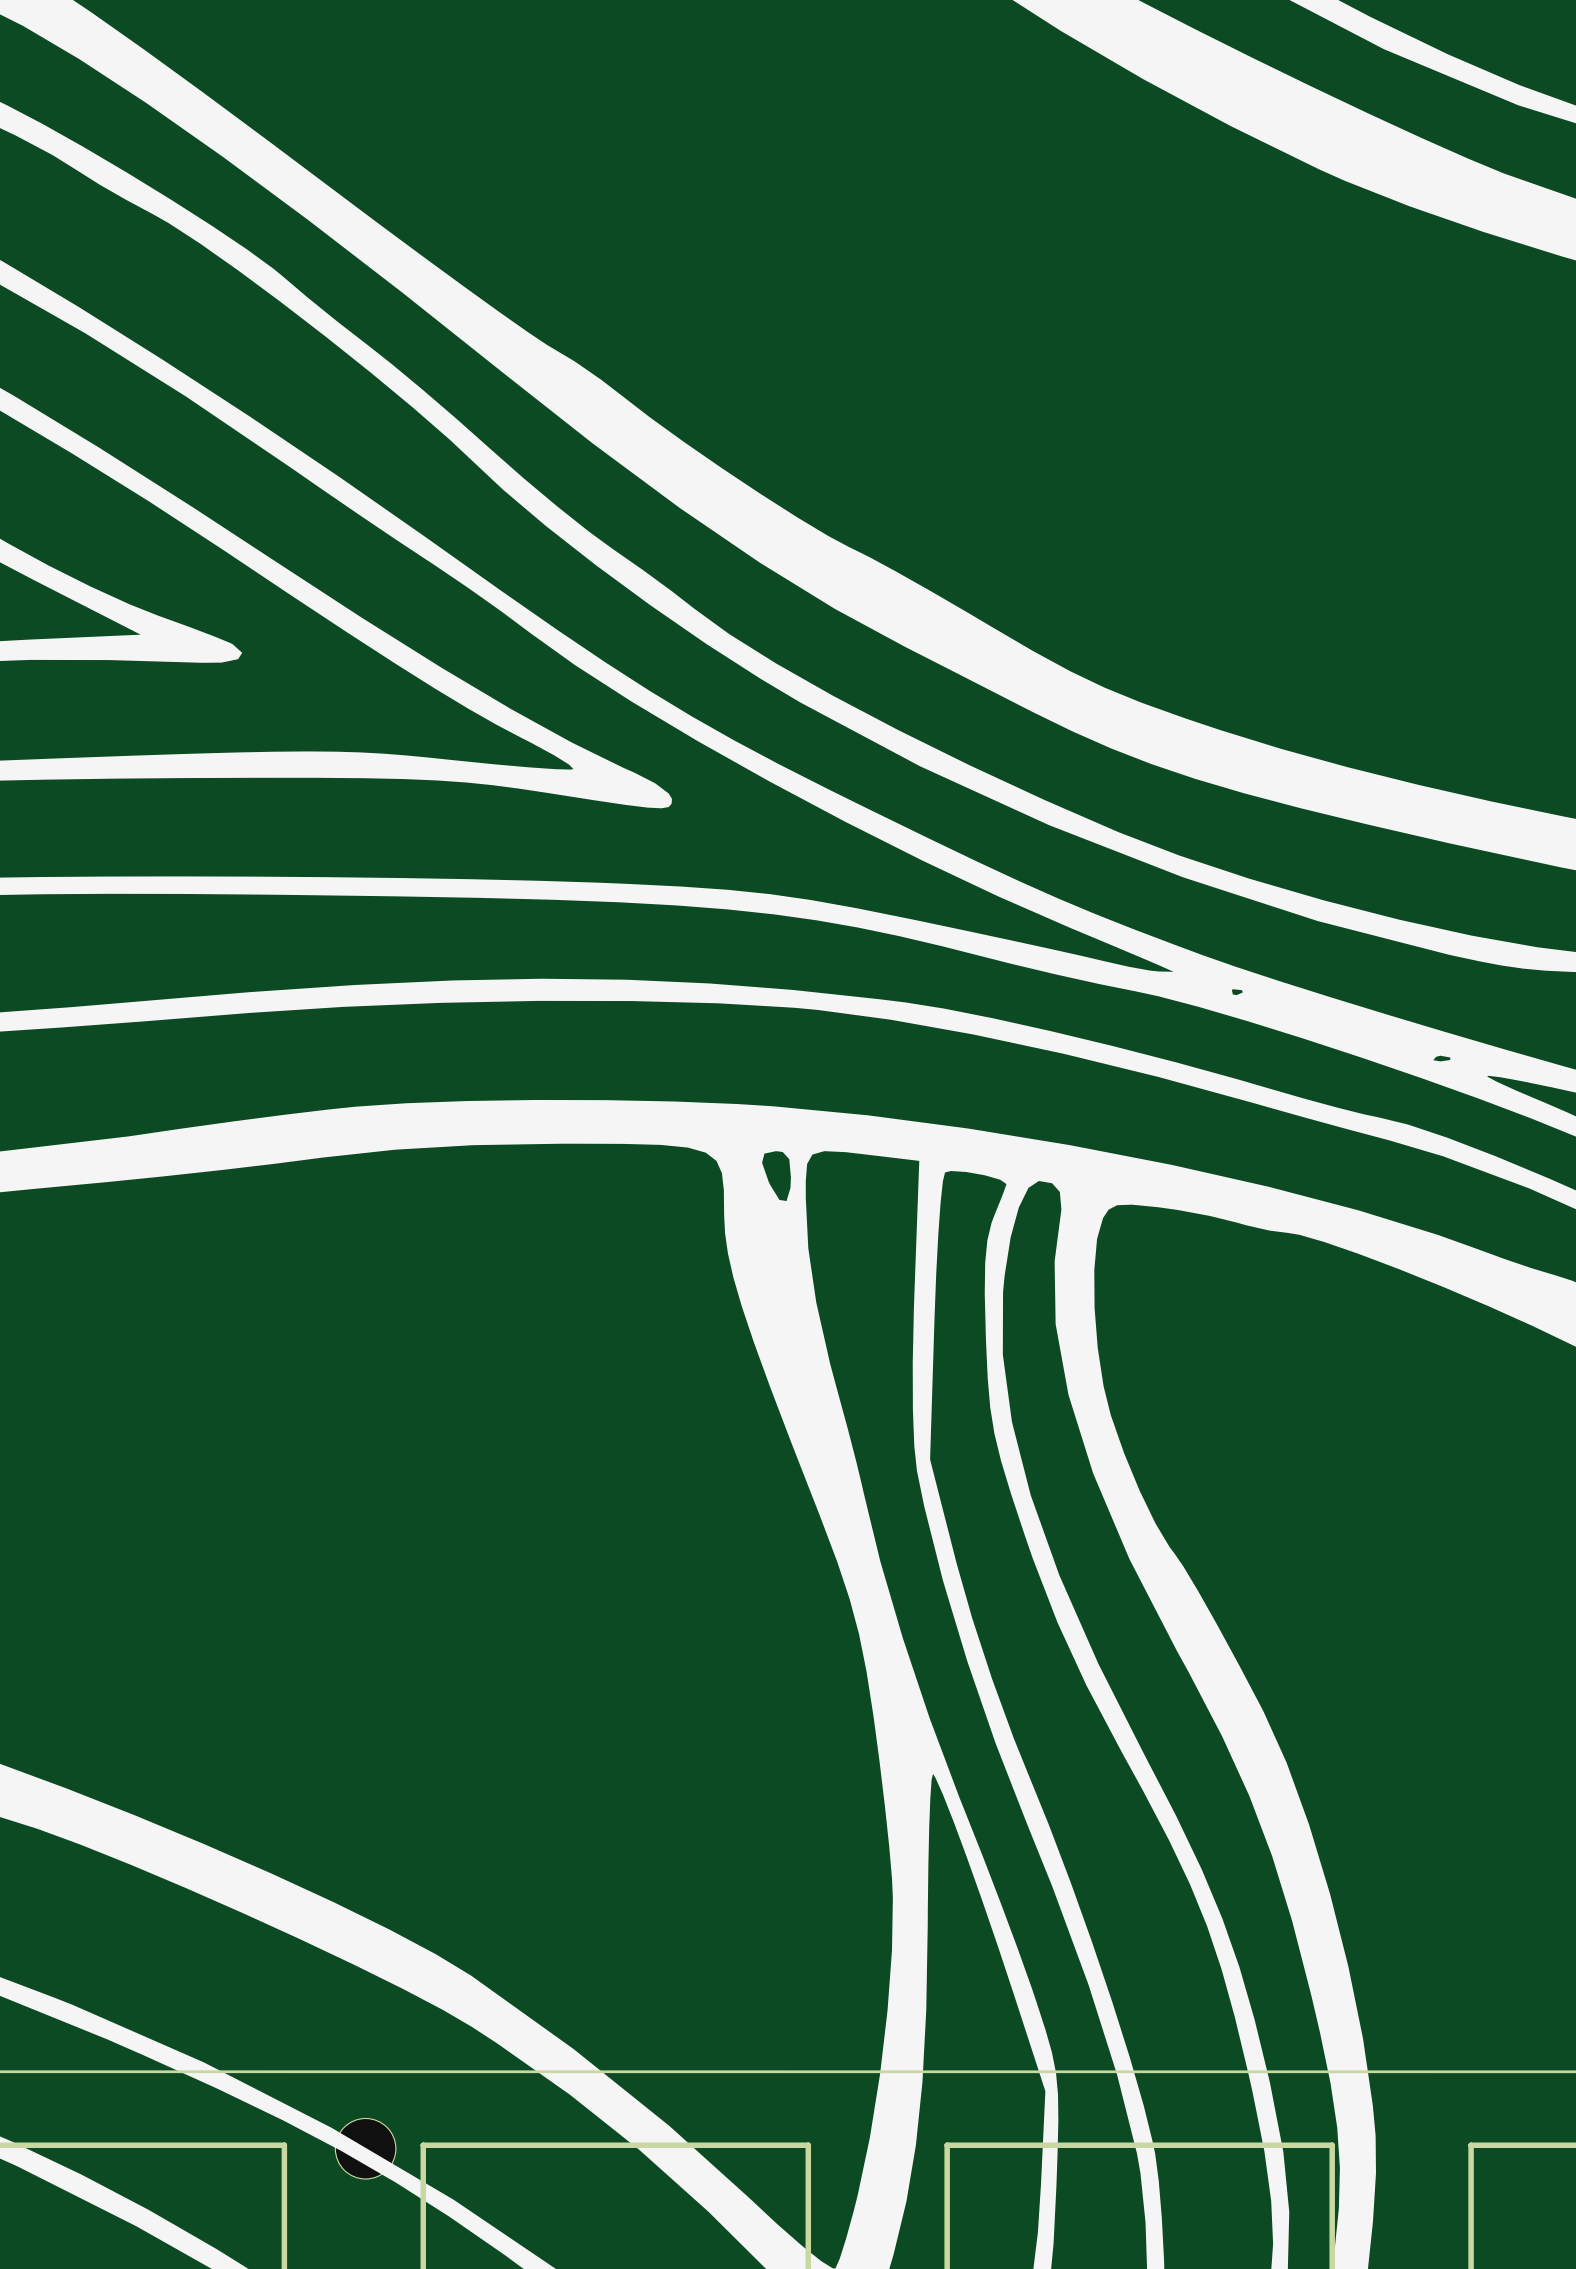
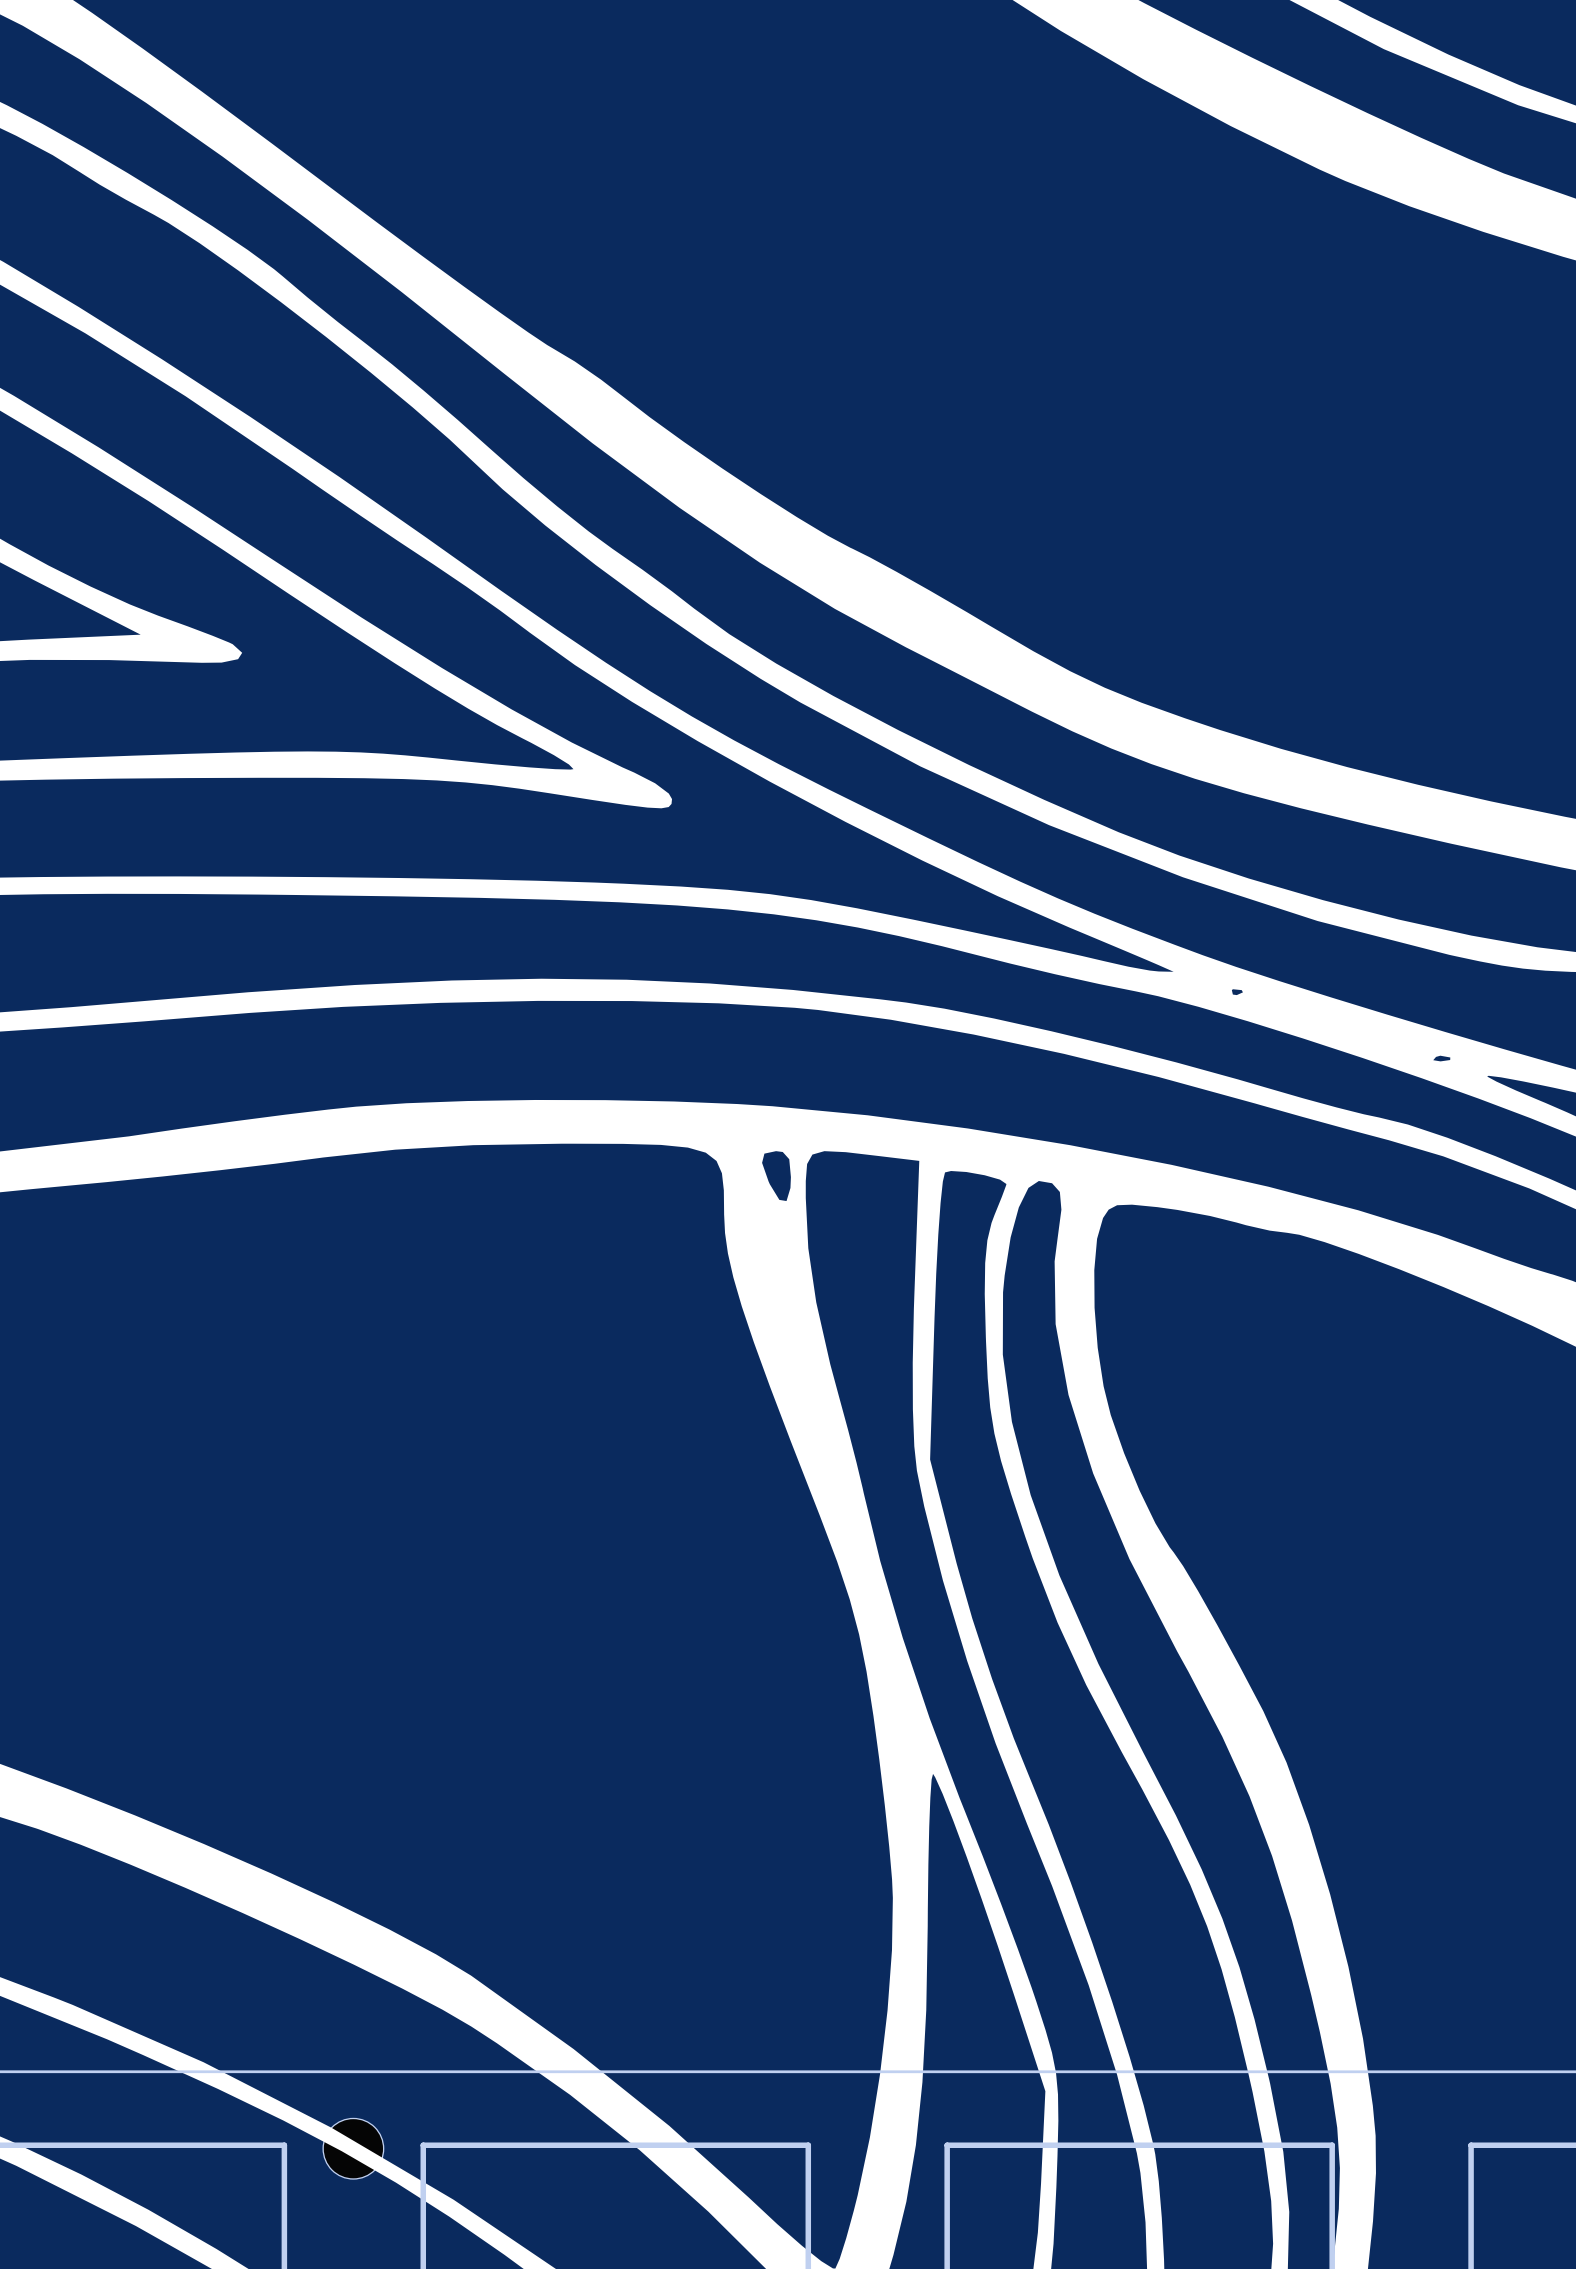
part position: (365, 2148) -> (353, 2148)

